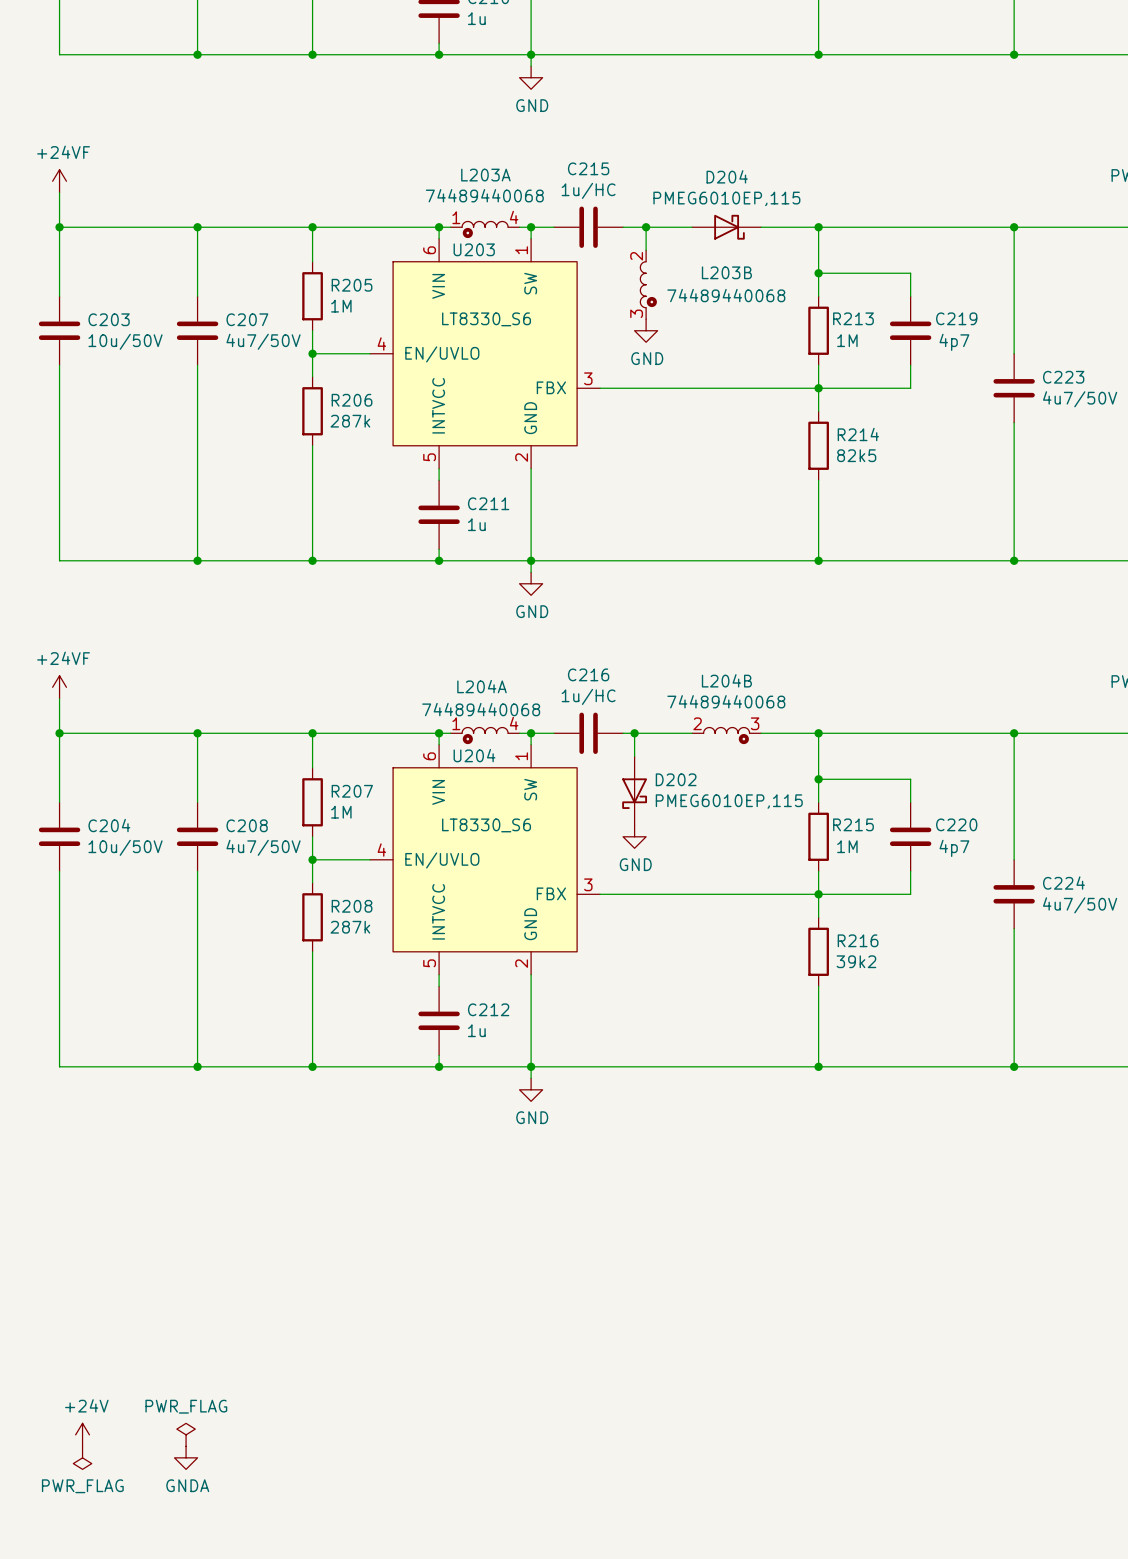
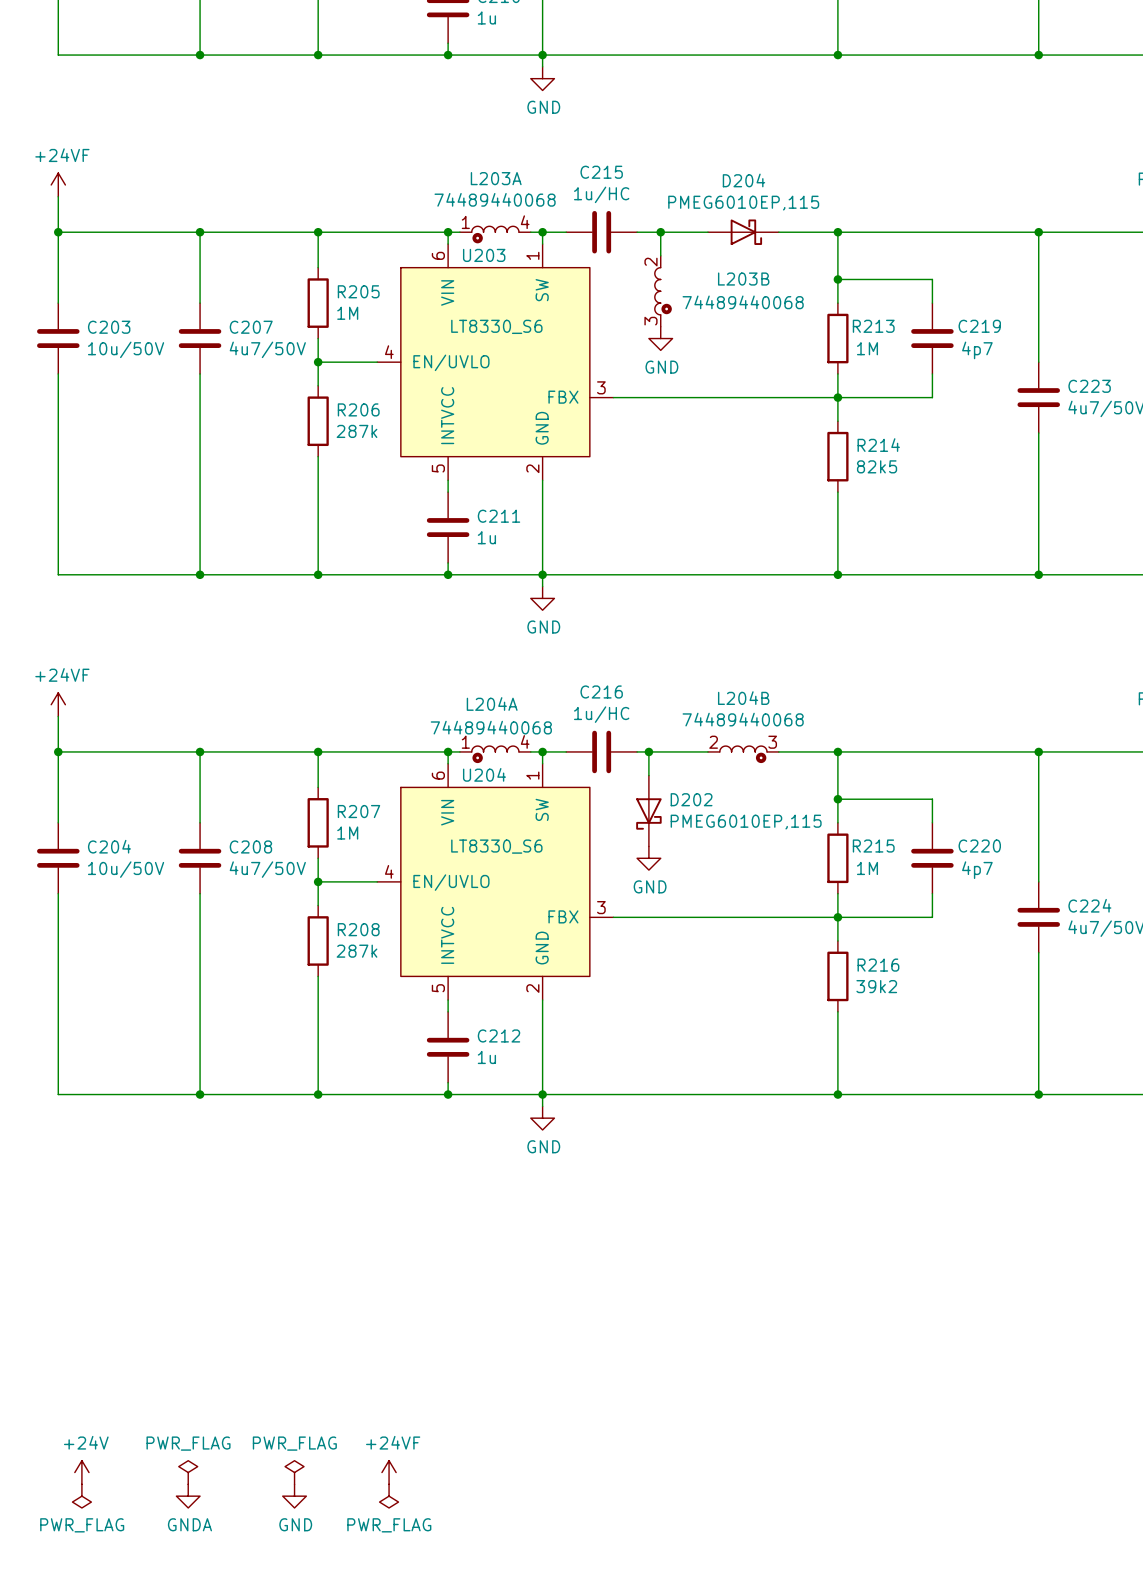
power symbol: none -> PWR_FLAG (294, 1472)
power symbol: none -> +24VF (389, 1472)
power symbol: none -> GND (294, 1496)
power symbol: none -> PWR_FLAG (389, 1496)

